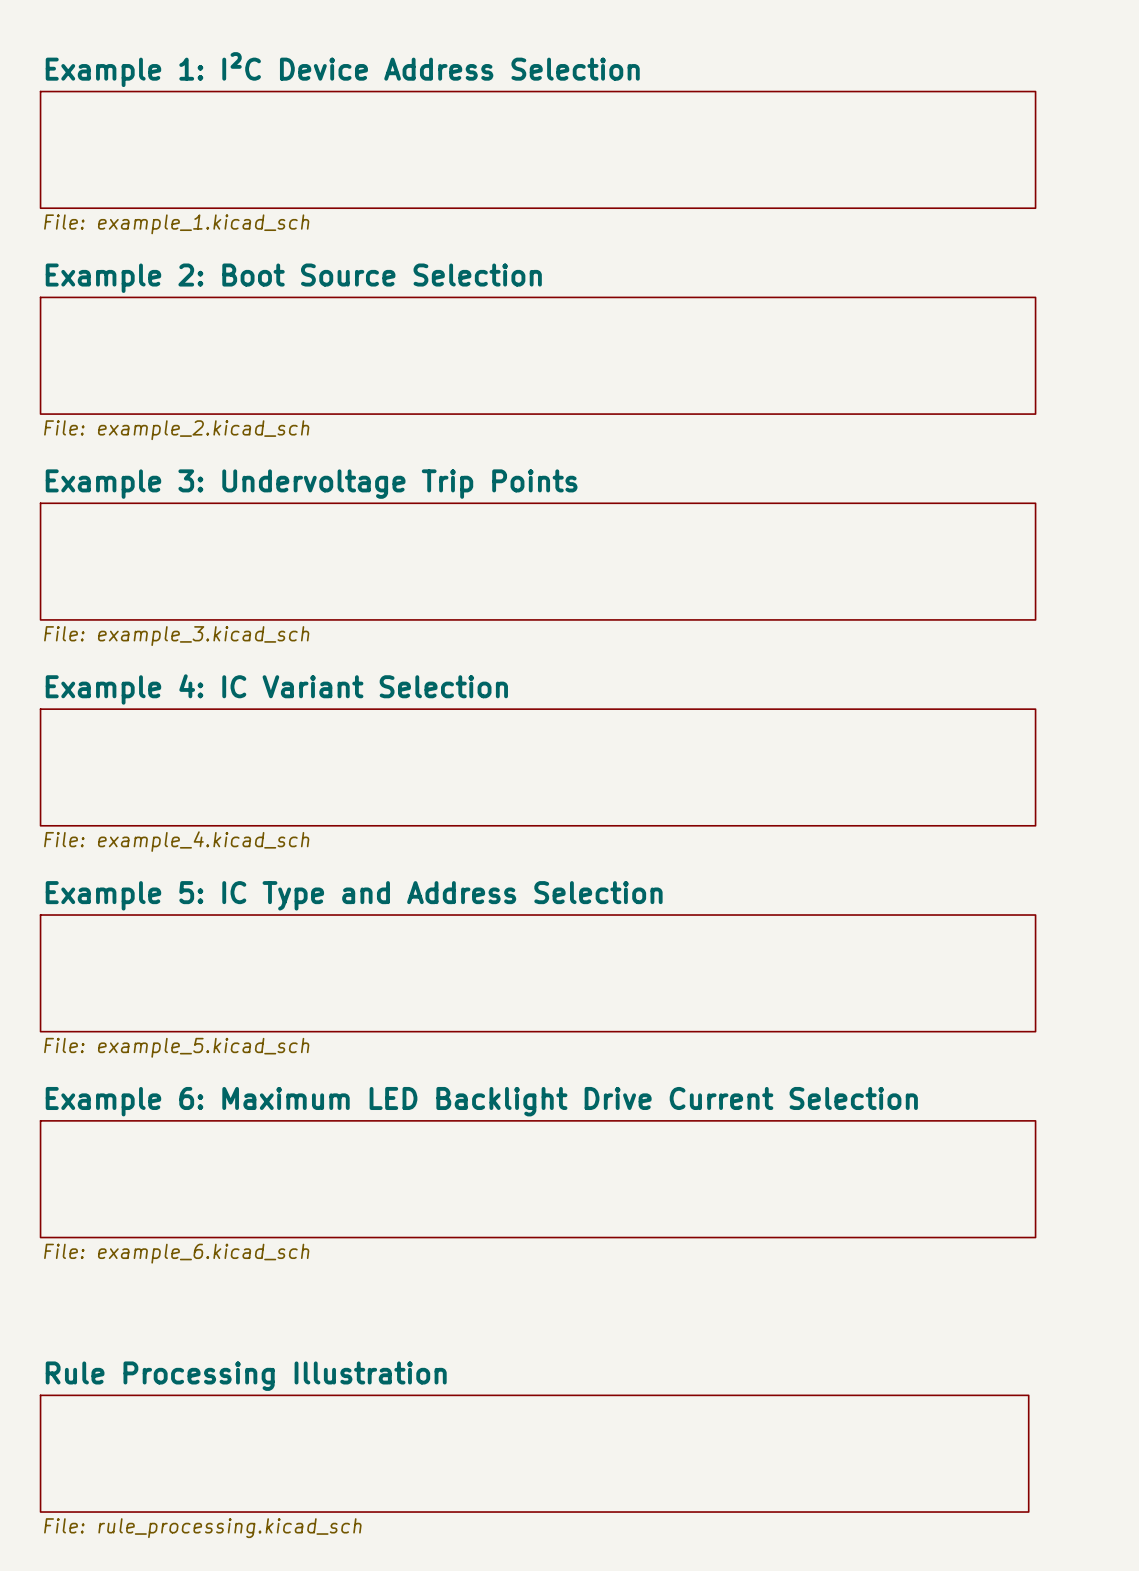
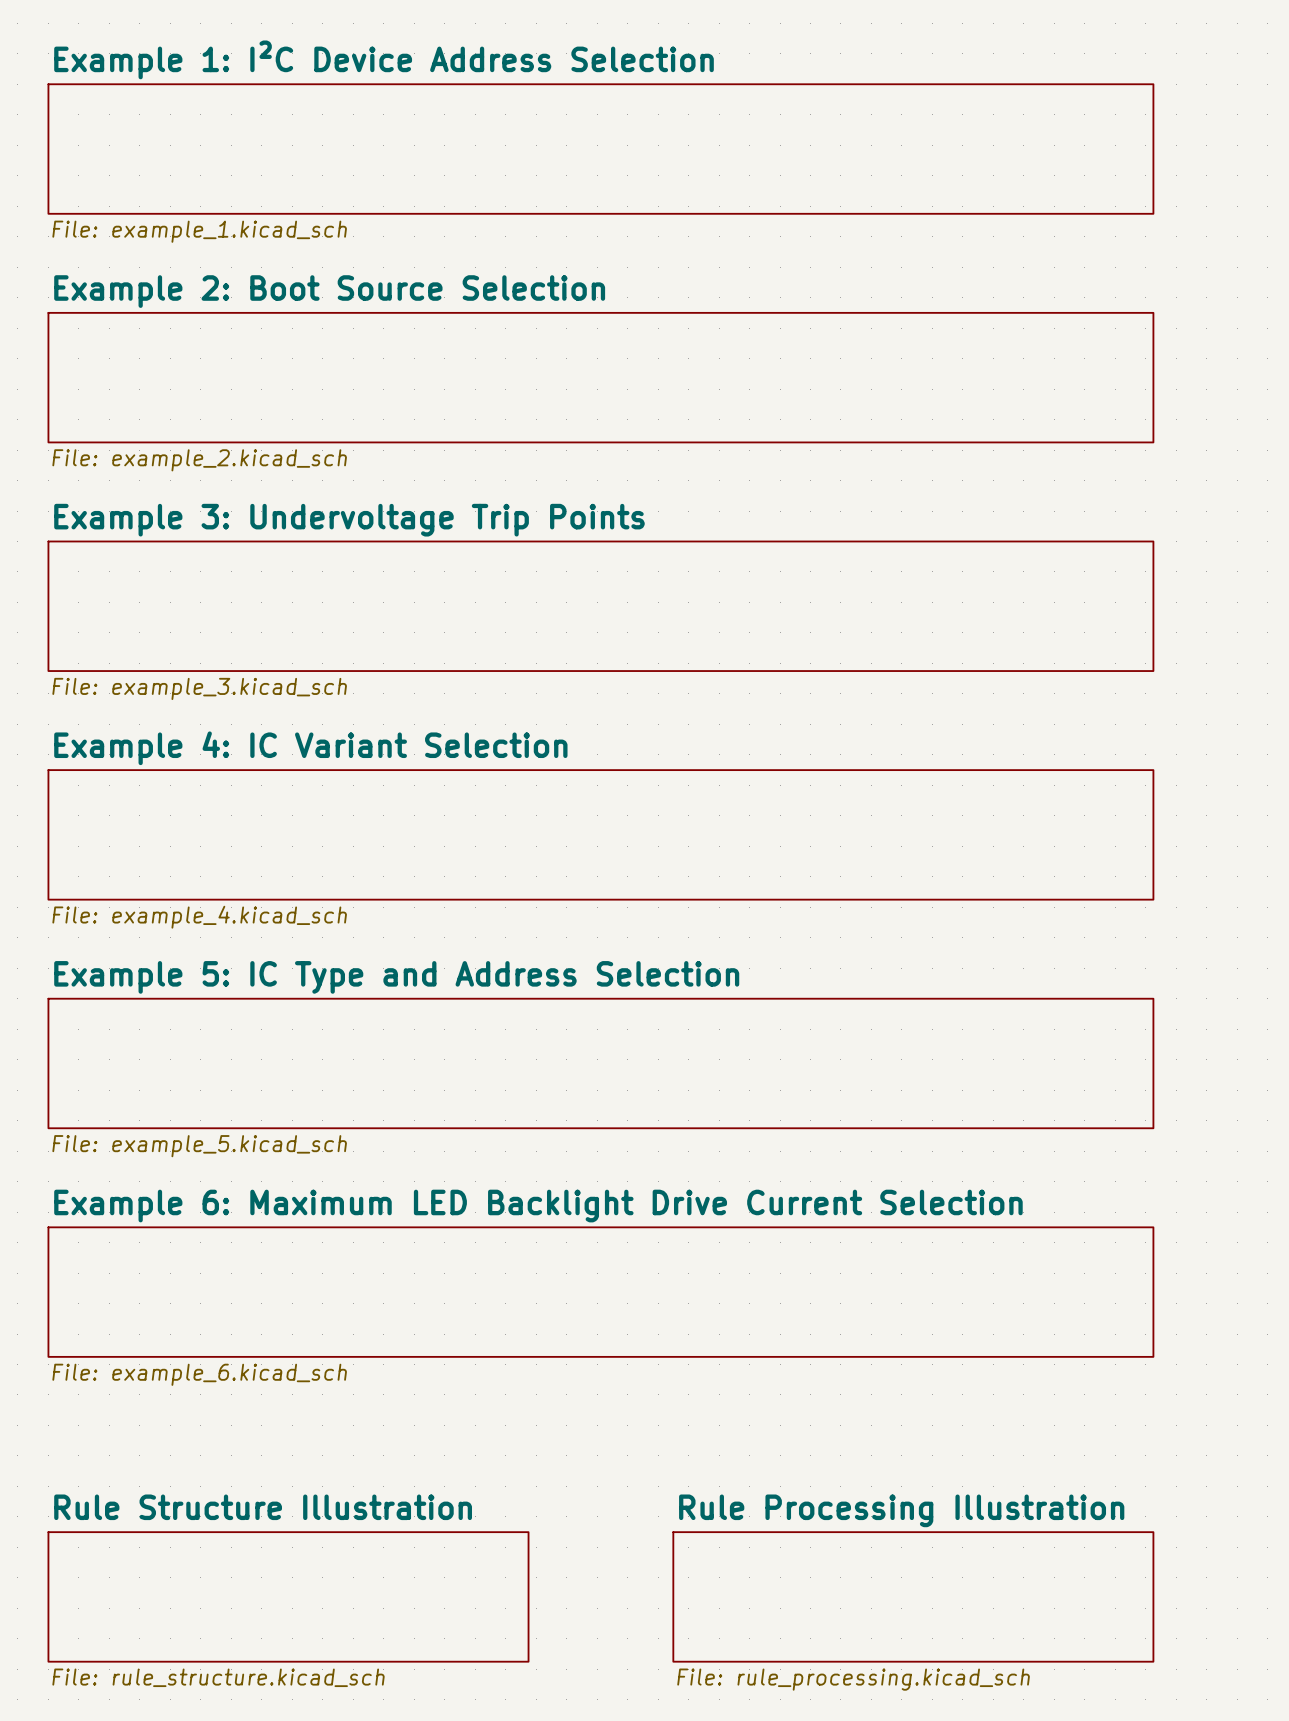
sheet Rule Structure Illustration: none -> File: rule_structure.kicad_sch (288, 1596)
sheet Rule Processing Illustration: File: rule_processing.kicad_sch (534, 1453) -> none
sheet Rule Processing Illustration: none -> File: rule_processing.kicad_sch (913, 1596)

